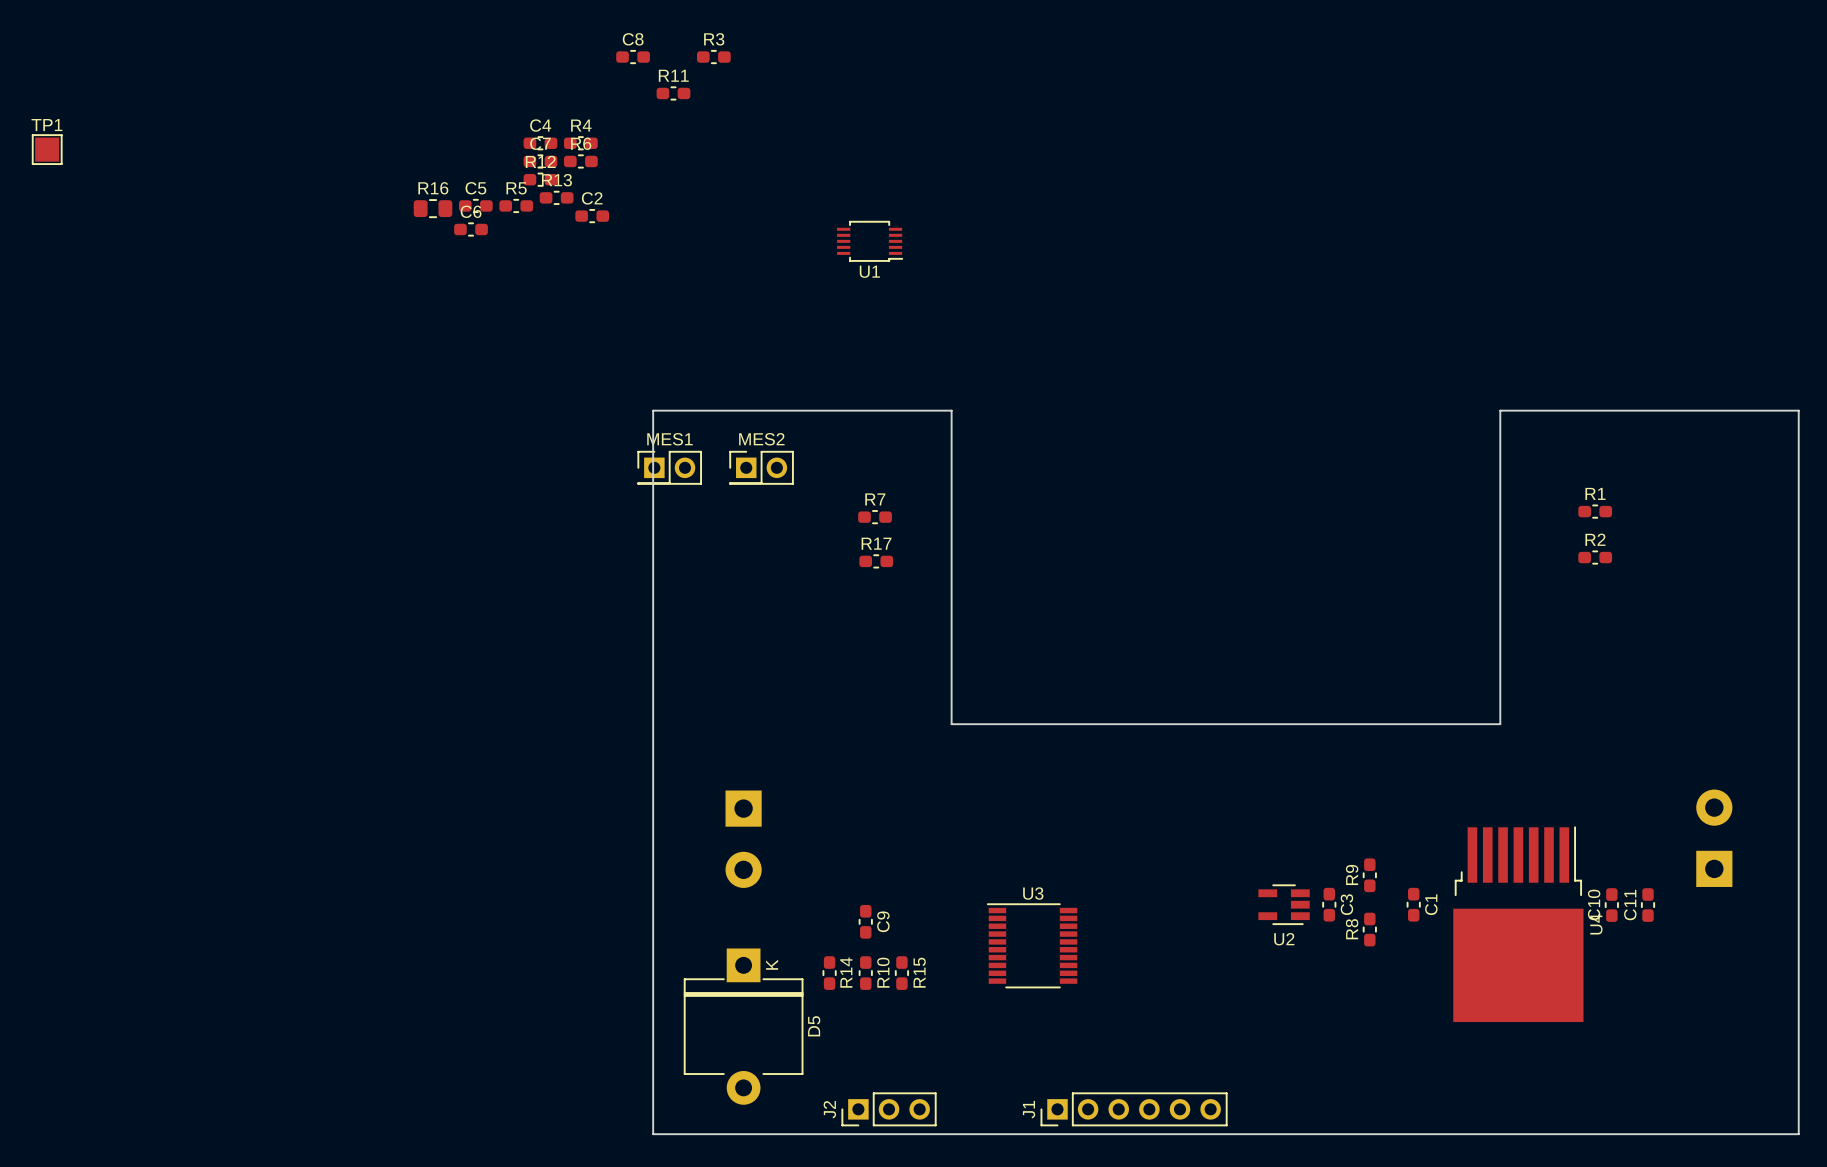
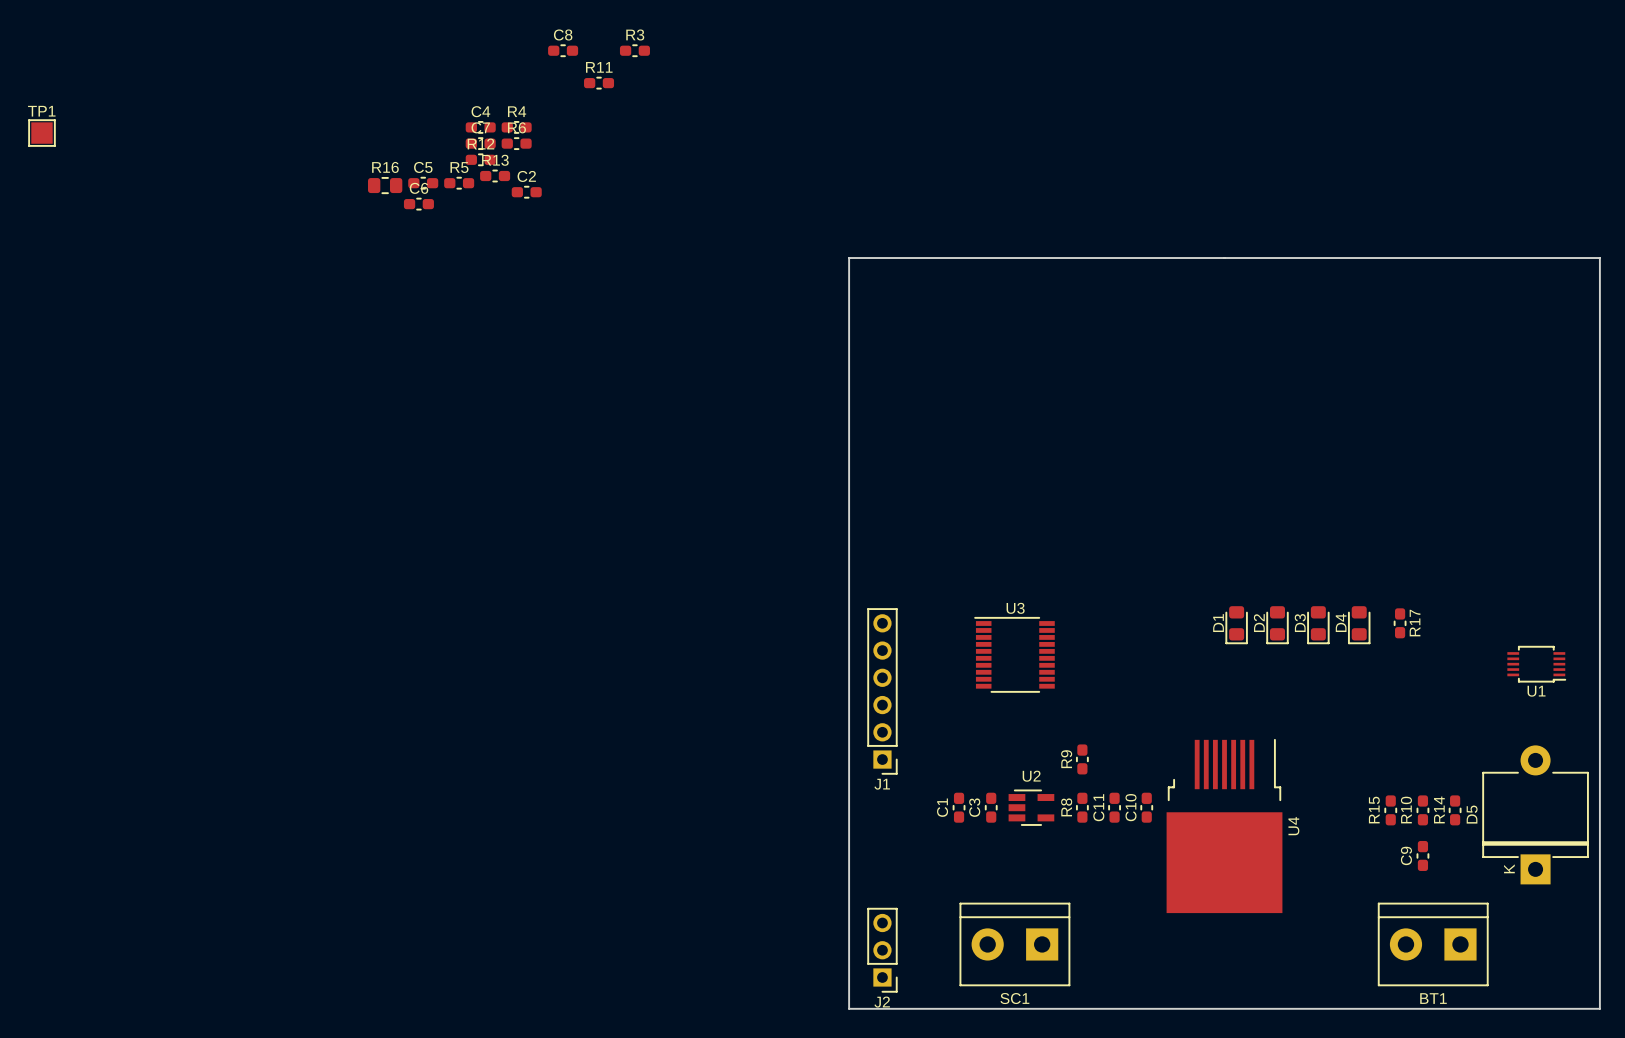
U1 position: (870, 241) -> (1536, 664)
board edge: (1798, 410) (1500, 410) (1500, 724) (951, 724) (951, 410) (653, 410) (653, 1134) (954, 1134) -> (1599, 365) (1599, 258) (849, 258) (849, 1008)
MES1: (669, 467) -> none
MES2: (761, 467) -> none
R1: (1595, 511) -> none
R7: (875, 517) -> none
R2: (1595, 557) -> none
R17 rotation: 0° (876, 561) -> 90° clockwise (1400, 623)
R17 position: (876, 561) -> (1400, 623)
D1: none -> (1236, 625)
D2: none -> (1277, 625)
D3: none -> (1318, 625)
D4: none -> (1359, 625)
U4 footprint: [1453, 826, 1584, 1023] -> [1166, 739, 1283, 914]
part: (1714, 838) -> none
part: (743, 839) -> none
R9 position: (1369, 875) -> (1082, 759)
U2 rotation: 0° (1284, 904) -> 180° (1031, 807)
U2 position: (1284, 904) -> (1031, 807)
C3 position: (1329, 904) -> (991, 807)
C3 name position: C3 (1346, 904) -> C3 (974, 807)
C1 position: (1413, 904) -> (959, 807)
C1 name position: C1 (1431, 904) -> C1 (942, 807)
C10 position: (1611, 905) -> (1146, 807)
C11 position: (1648, 905) -> (1114, 807)
C9 position: (865, 921) -> (1422, 855)
C9 name position: C9 (883, 921) -> C9 (1406, 855)
R8 position: (1369, 929) -> (1082, 807)
U3 position: (1032, 945) -> (1014, 654)
R14 name position: R14 (846, 972) -> R14 (1439, 809)
R10 name position: R10 (883, 972) -> R10 (1406, 810)
R15 name position: R15 (919, 972) -> R15 (1374, 810)
R14 position: (829, 973) -> (1455, 810)
R10 position: (865, 973) -> (1422, 810)
R15 position: (901, 973) -> (1390, 810)
D5 rotation: 0° (743, 1026) -> 180° (1535, 814)
D5 position: (743, 1026) -> (1535, 814)
SC1: none -> (1014, 944)
BT1: none -> (1433, 944)
J2 rotation: 0° (889, 1109) -> 90° counterclockwise (882, 950)
J2 position: (889, 1109) -> (882, 950)
J1 rotation: 0° (1134, 1109) -> 90° counterclockwise (882, 691)
J1 position: (1134, 1109) -> (882, 691)

